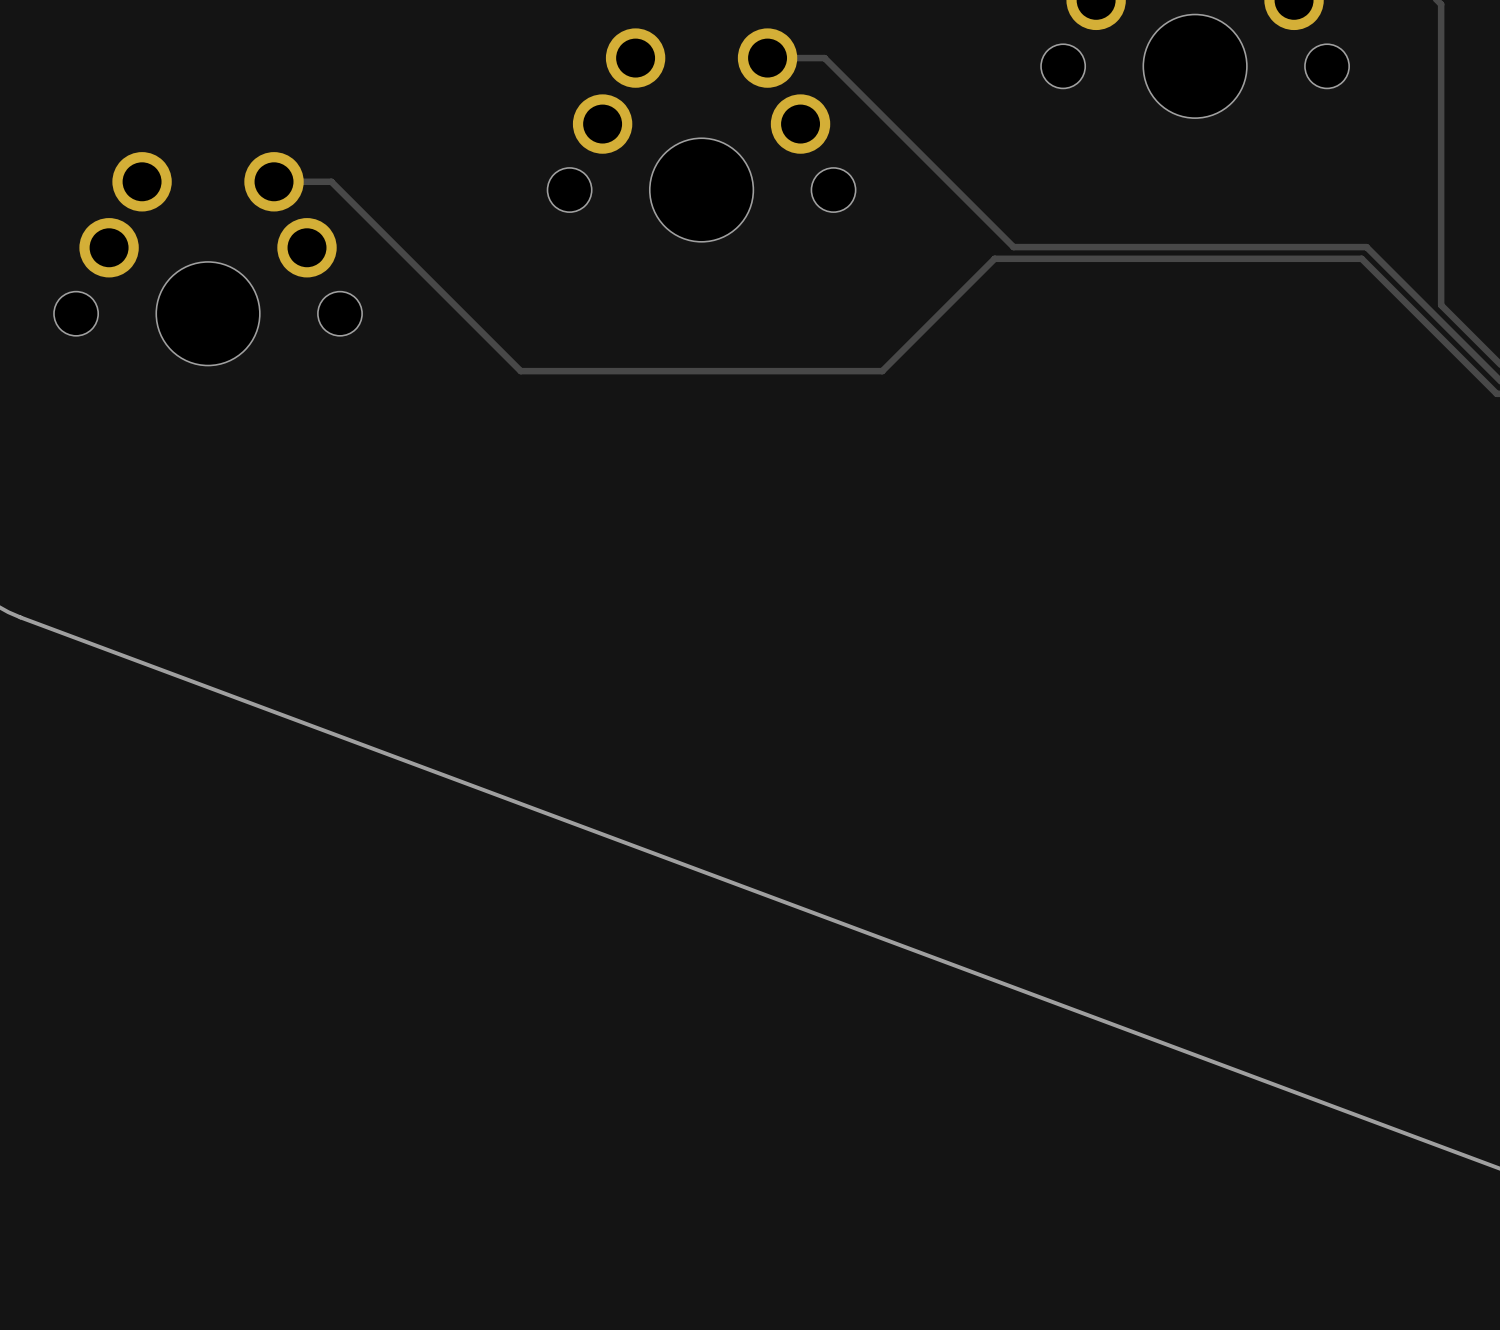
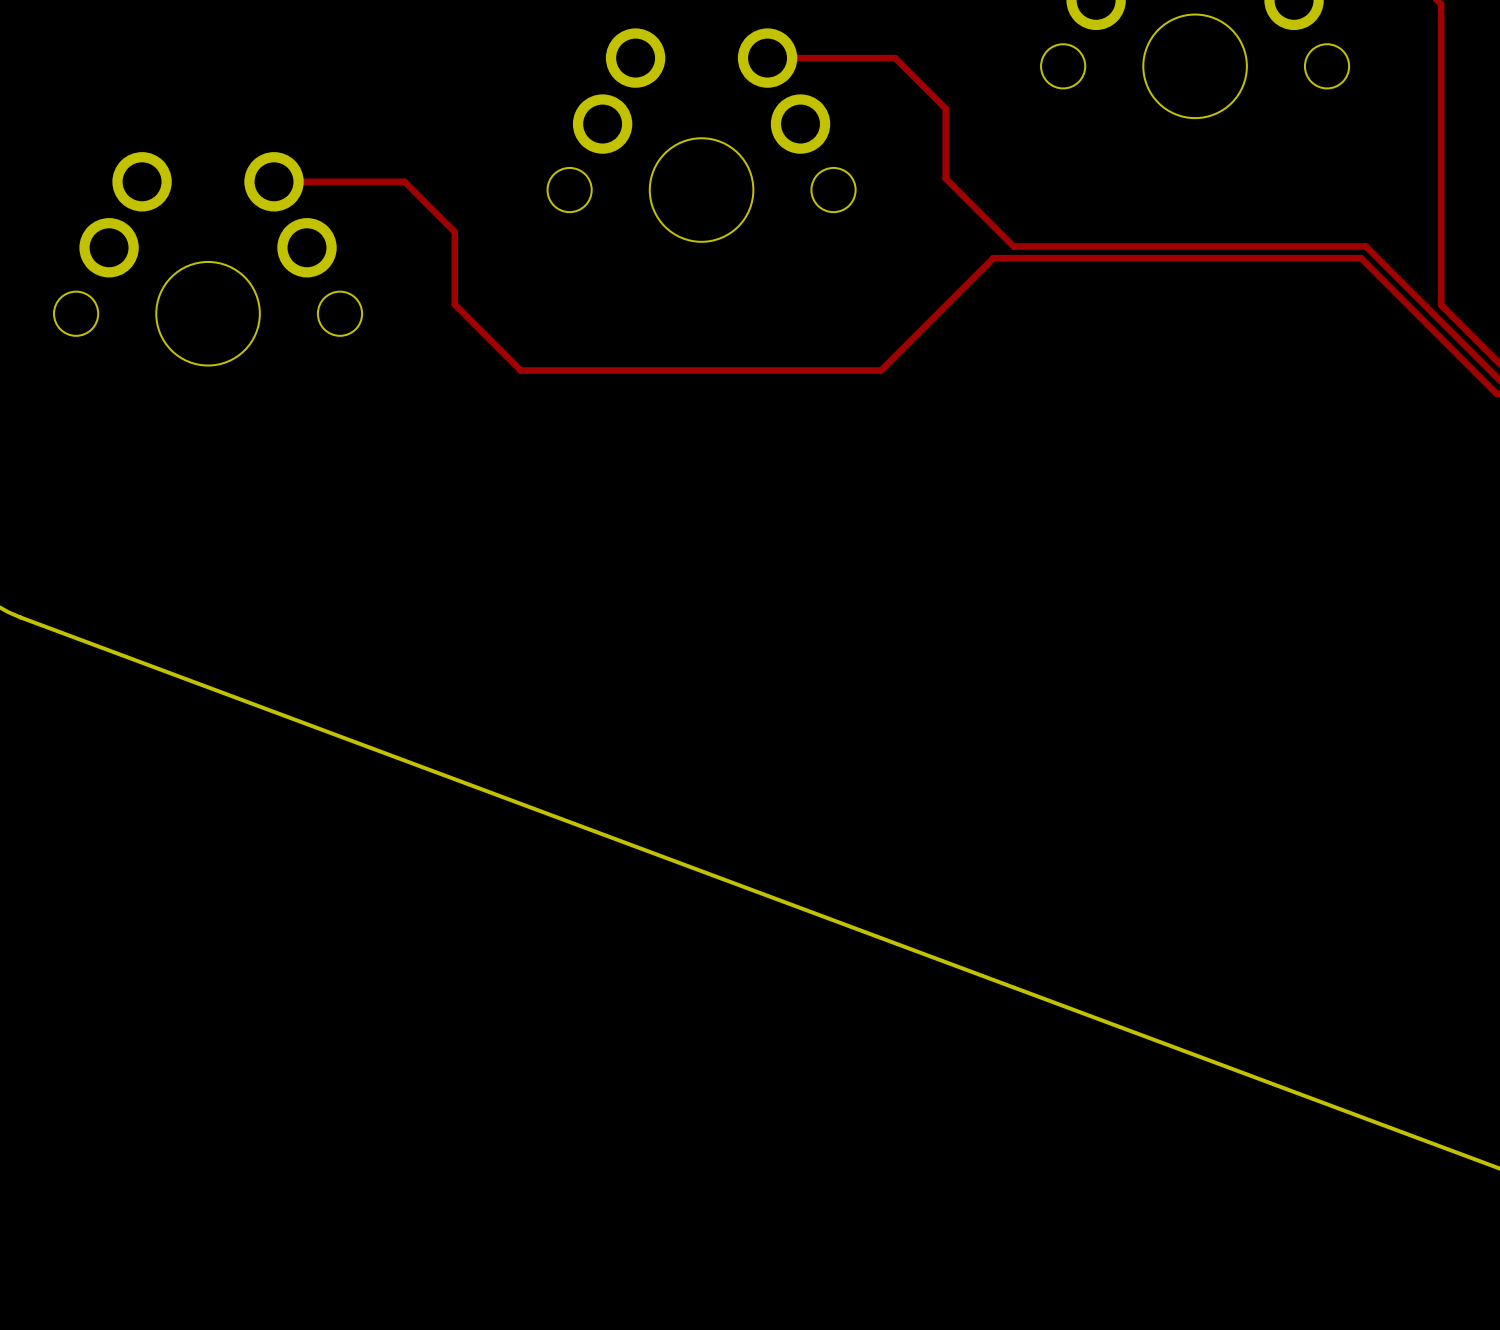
track: (824, 58) (1013, 247) (1366, 247) -> (824, 58) (895, 58) (945, 108) (945, 178) (1013, 246) (1366, 247)
track: (331, 181) (520, 371) (882, 371) (994, 258) (1361, 258) -> (331, 181) (404, 181) (454, 231) (454, 304) (520, 370) (881, 370) (993, 258) (1361, 258)

